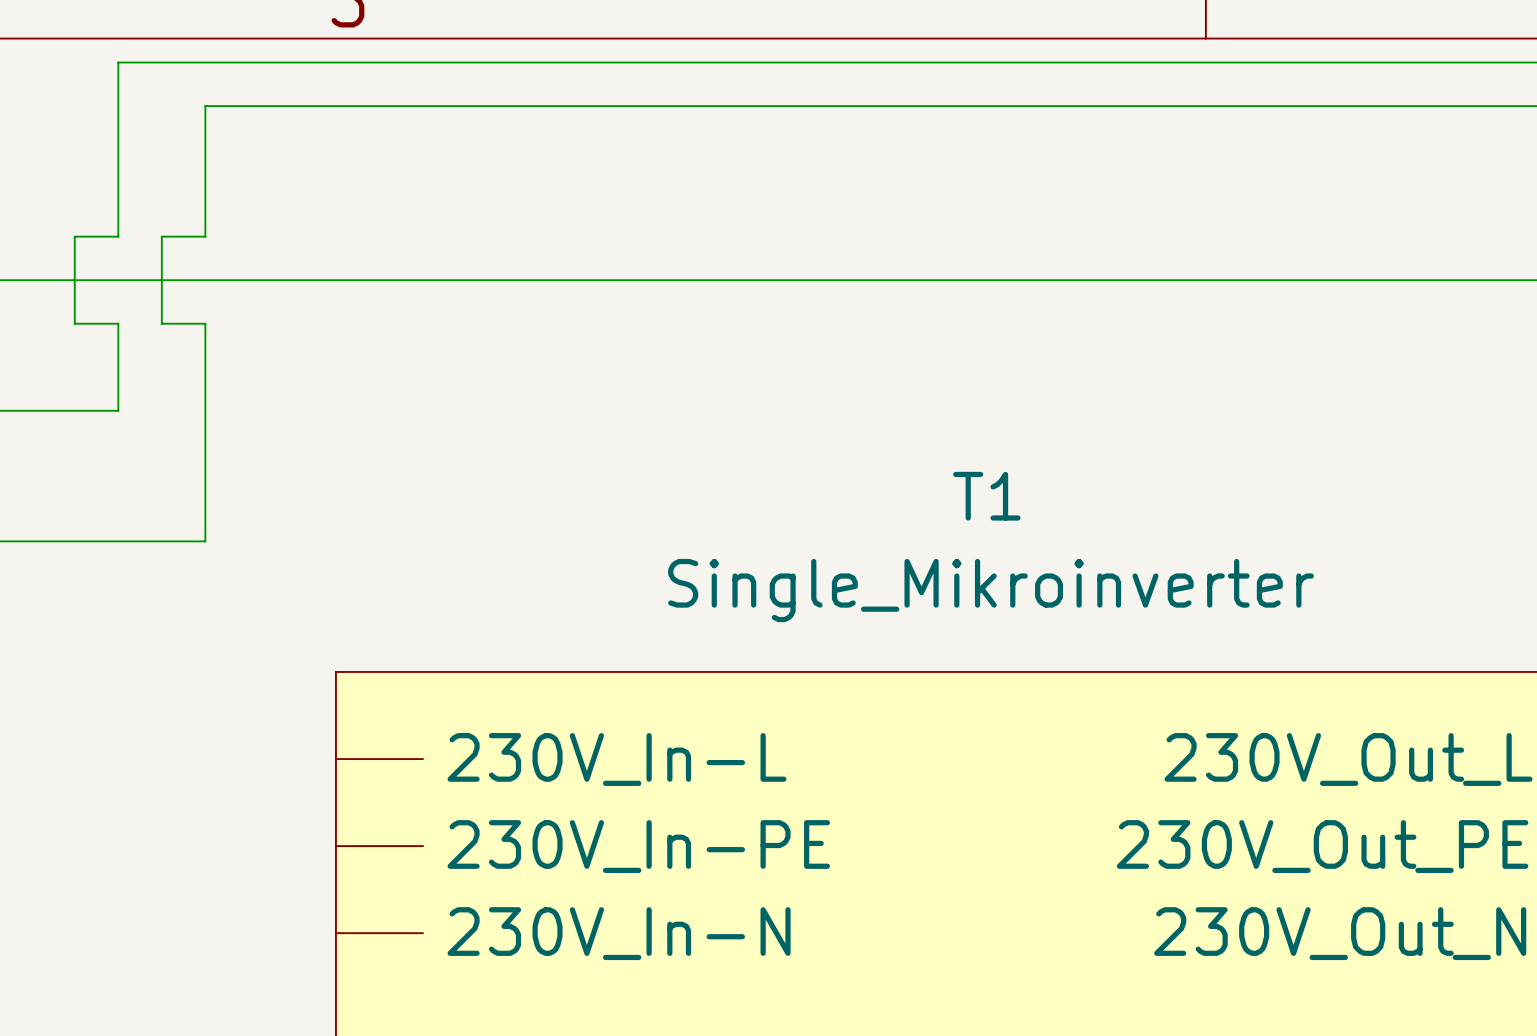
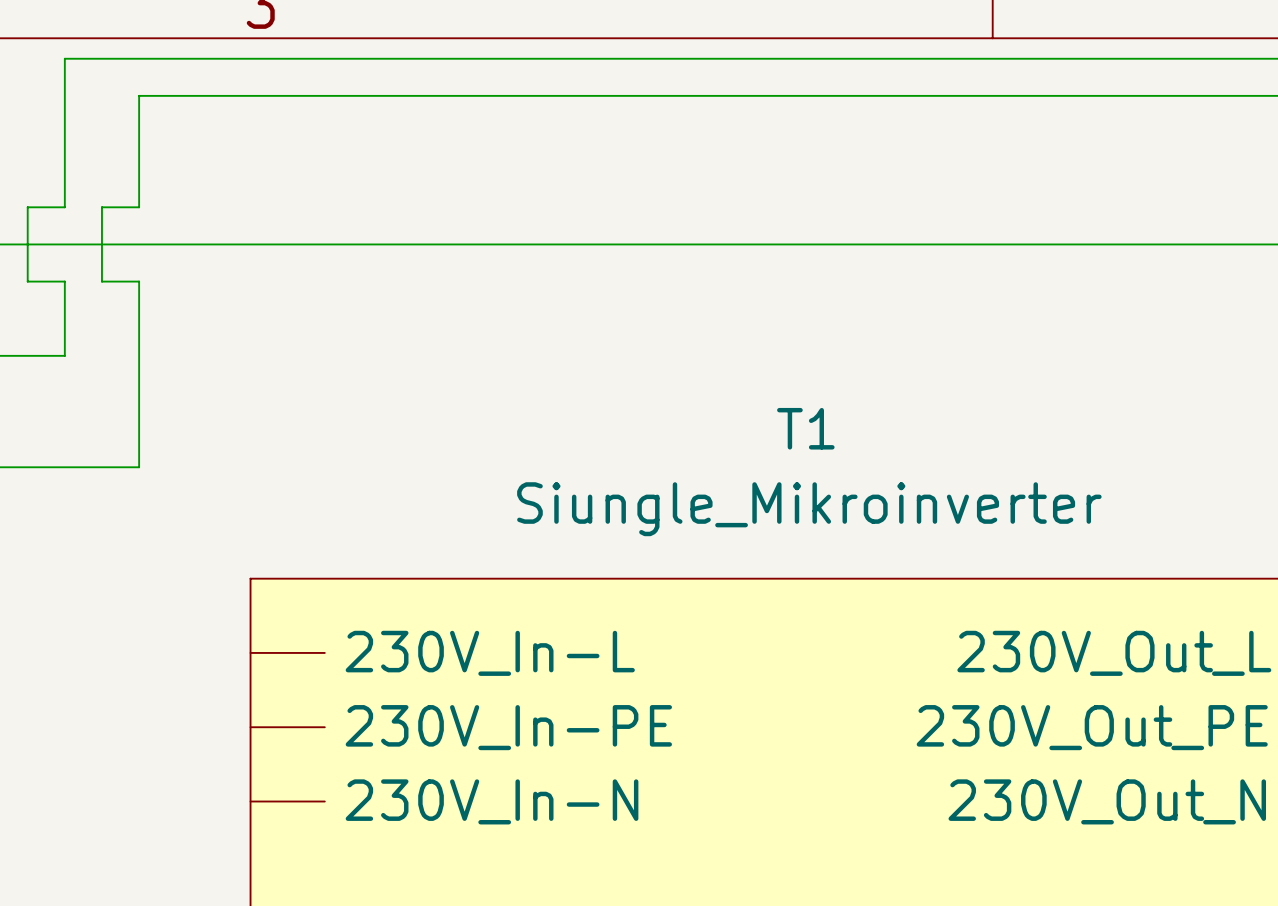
T1 value: Single_Mikroinverter (991, 590) -> Siungle_Mikroinverter (809, 509)

